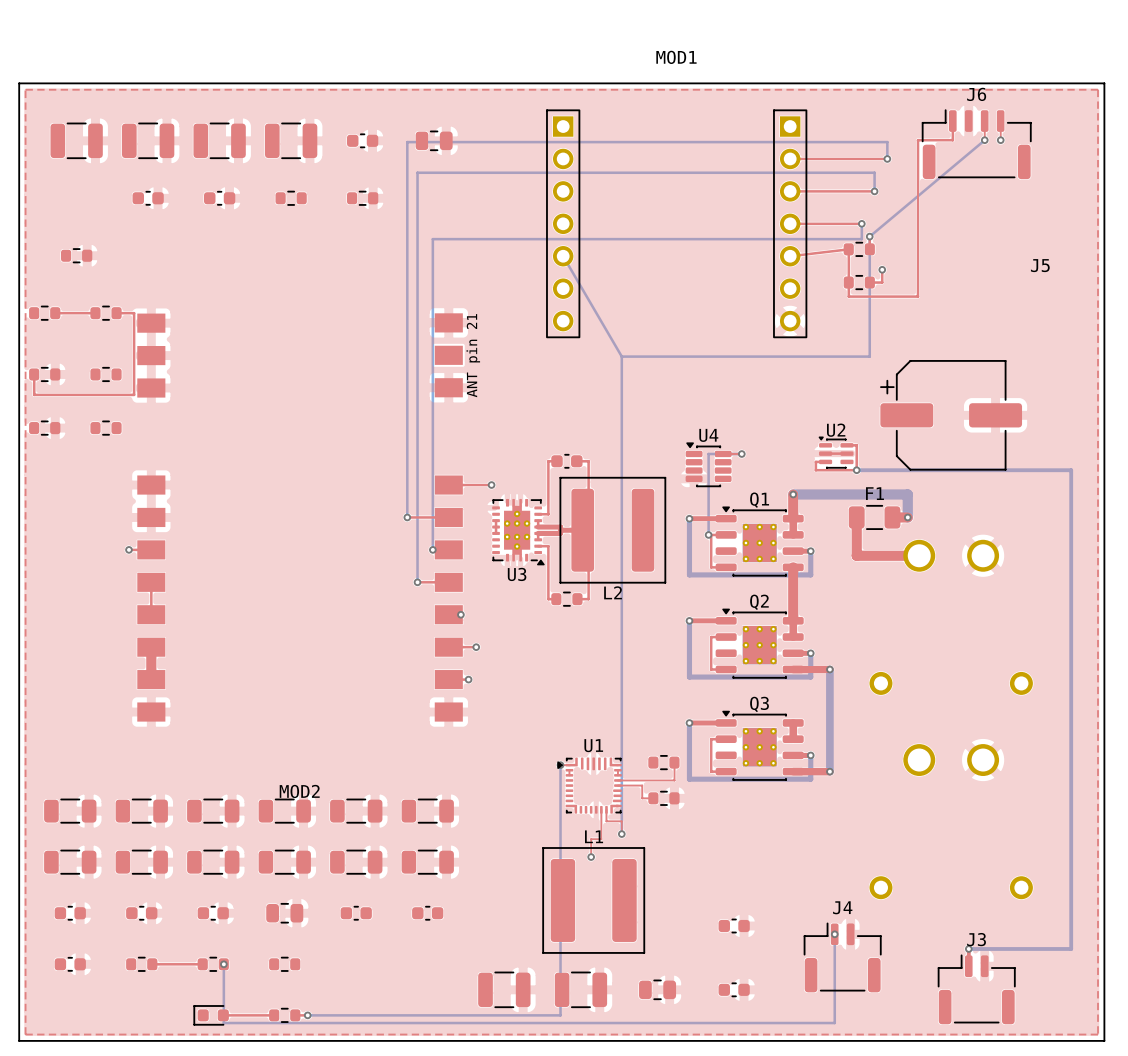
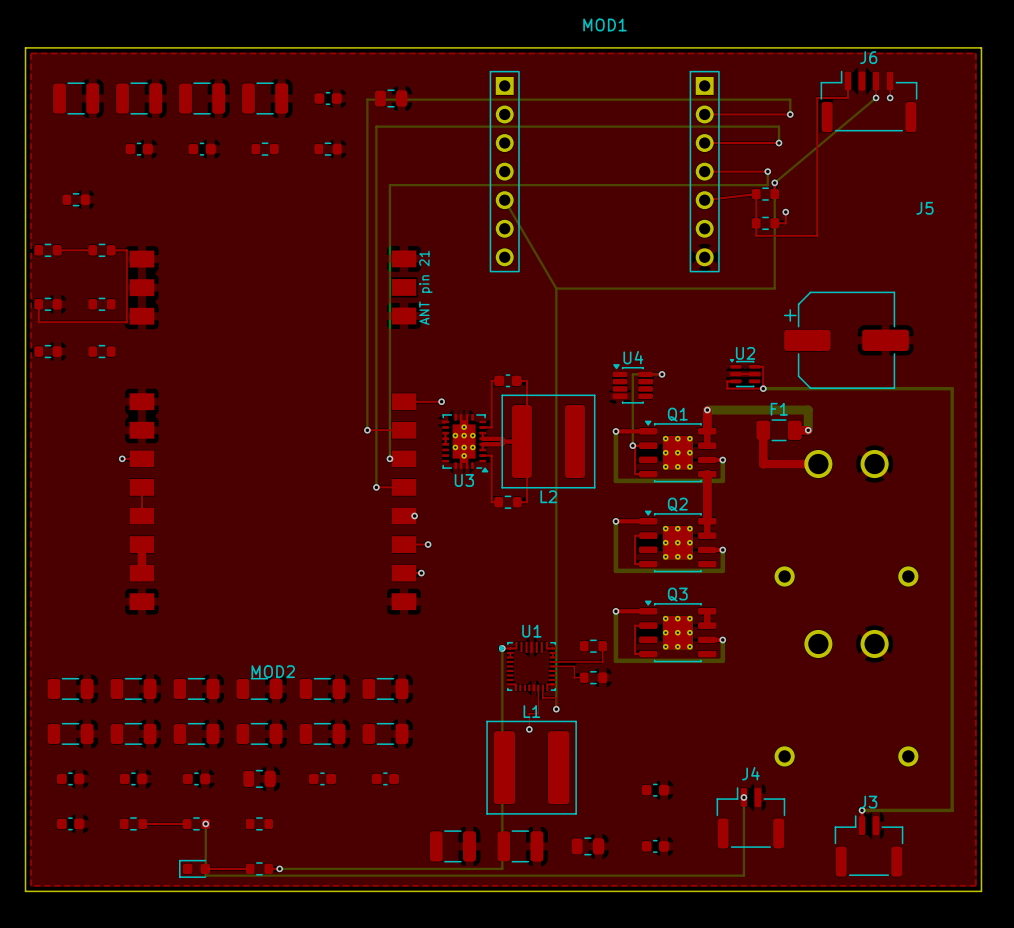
top track: (793, 669) (829, 669) -> none
bottom track: (829, 669) (829, 771) -> none
via: (829, 669) -> none
top track: (793, 771) (829, 771) -> none
via: (829, 771) -> none

